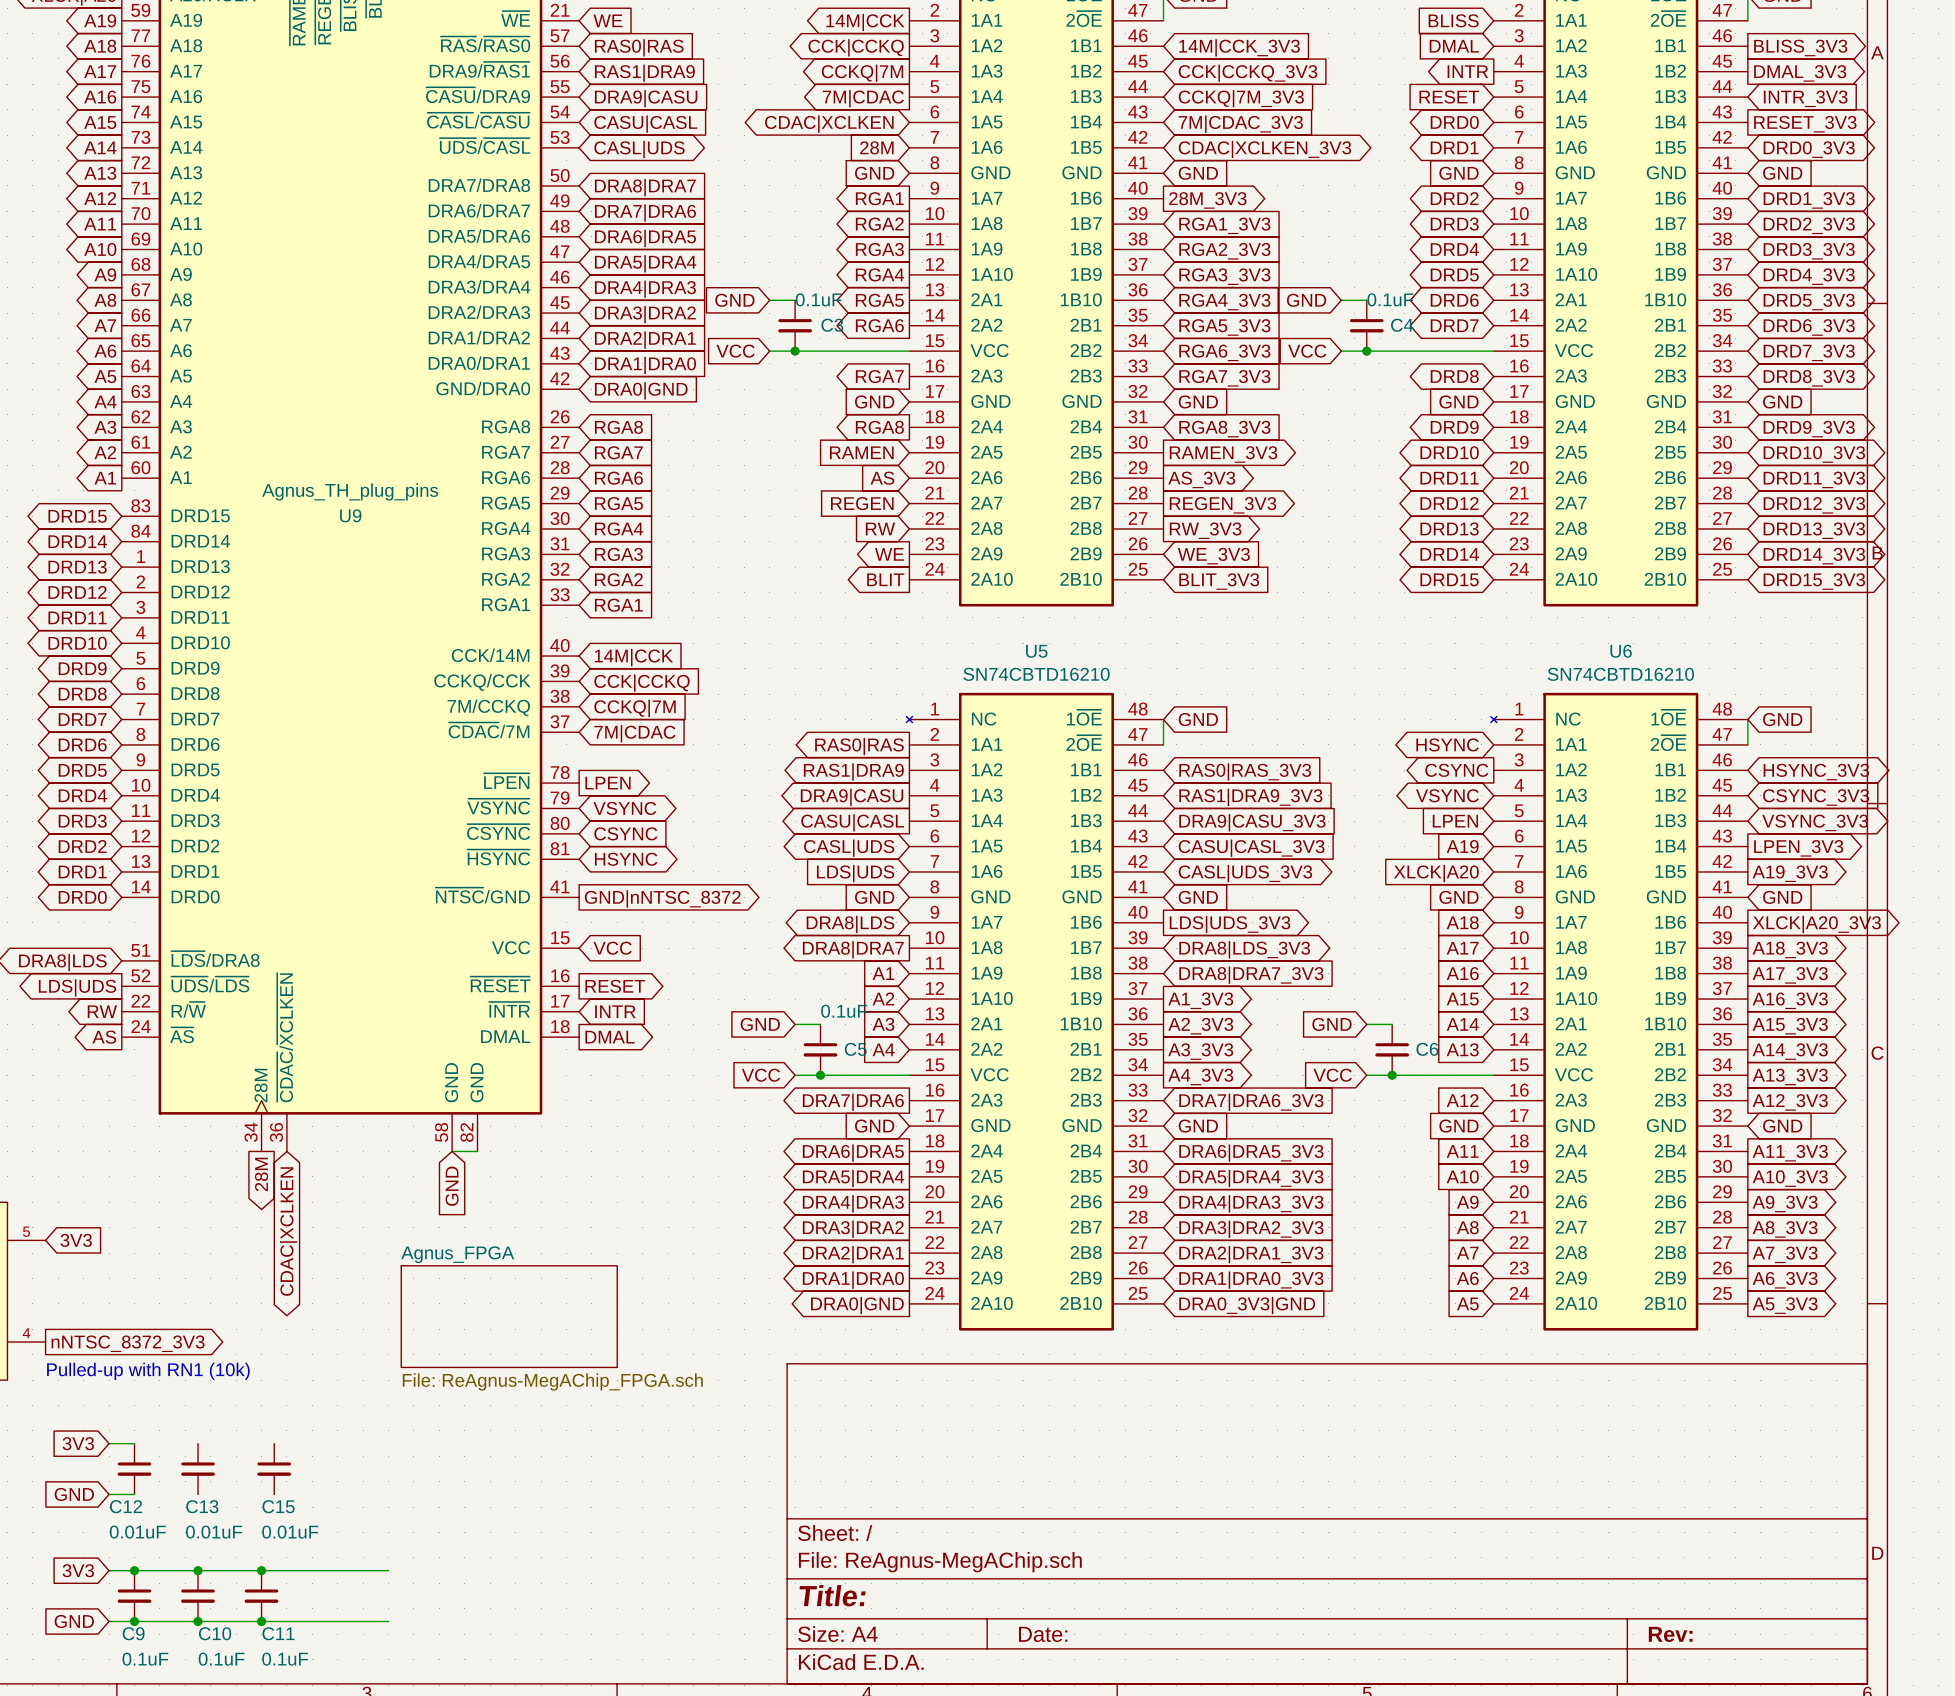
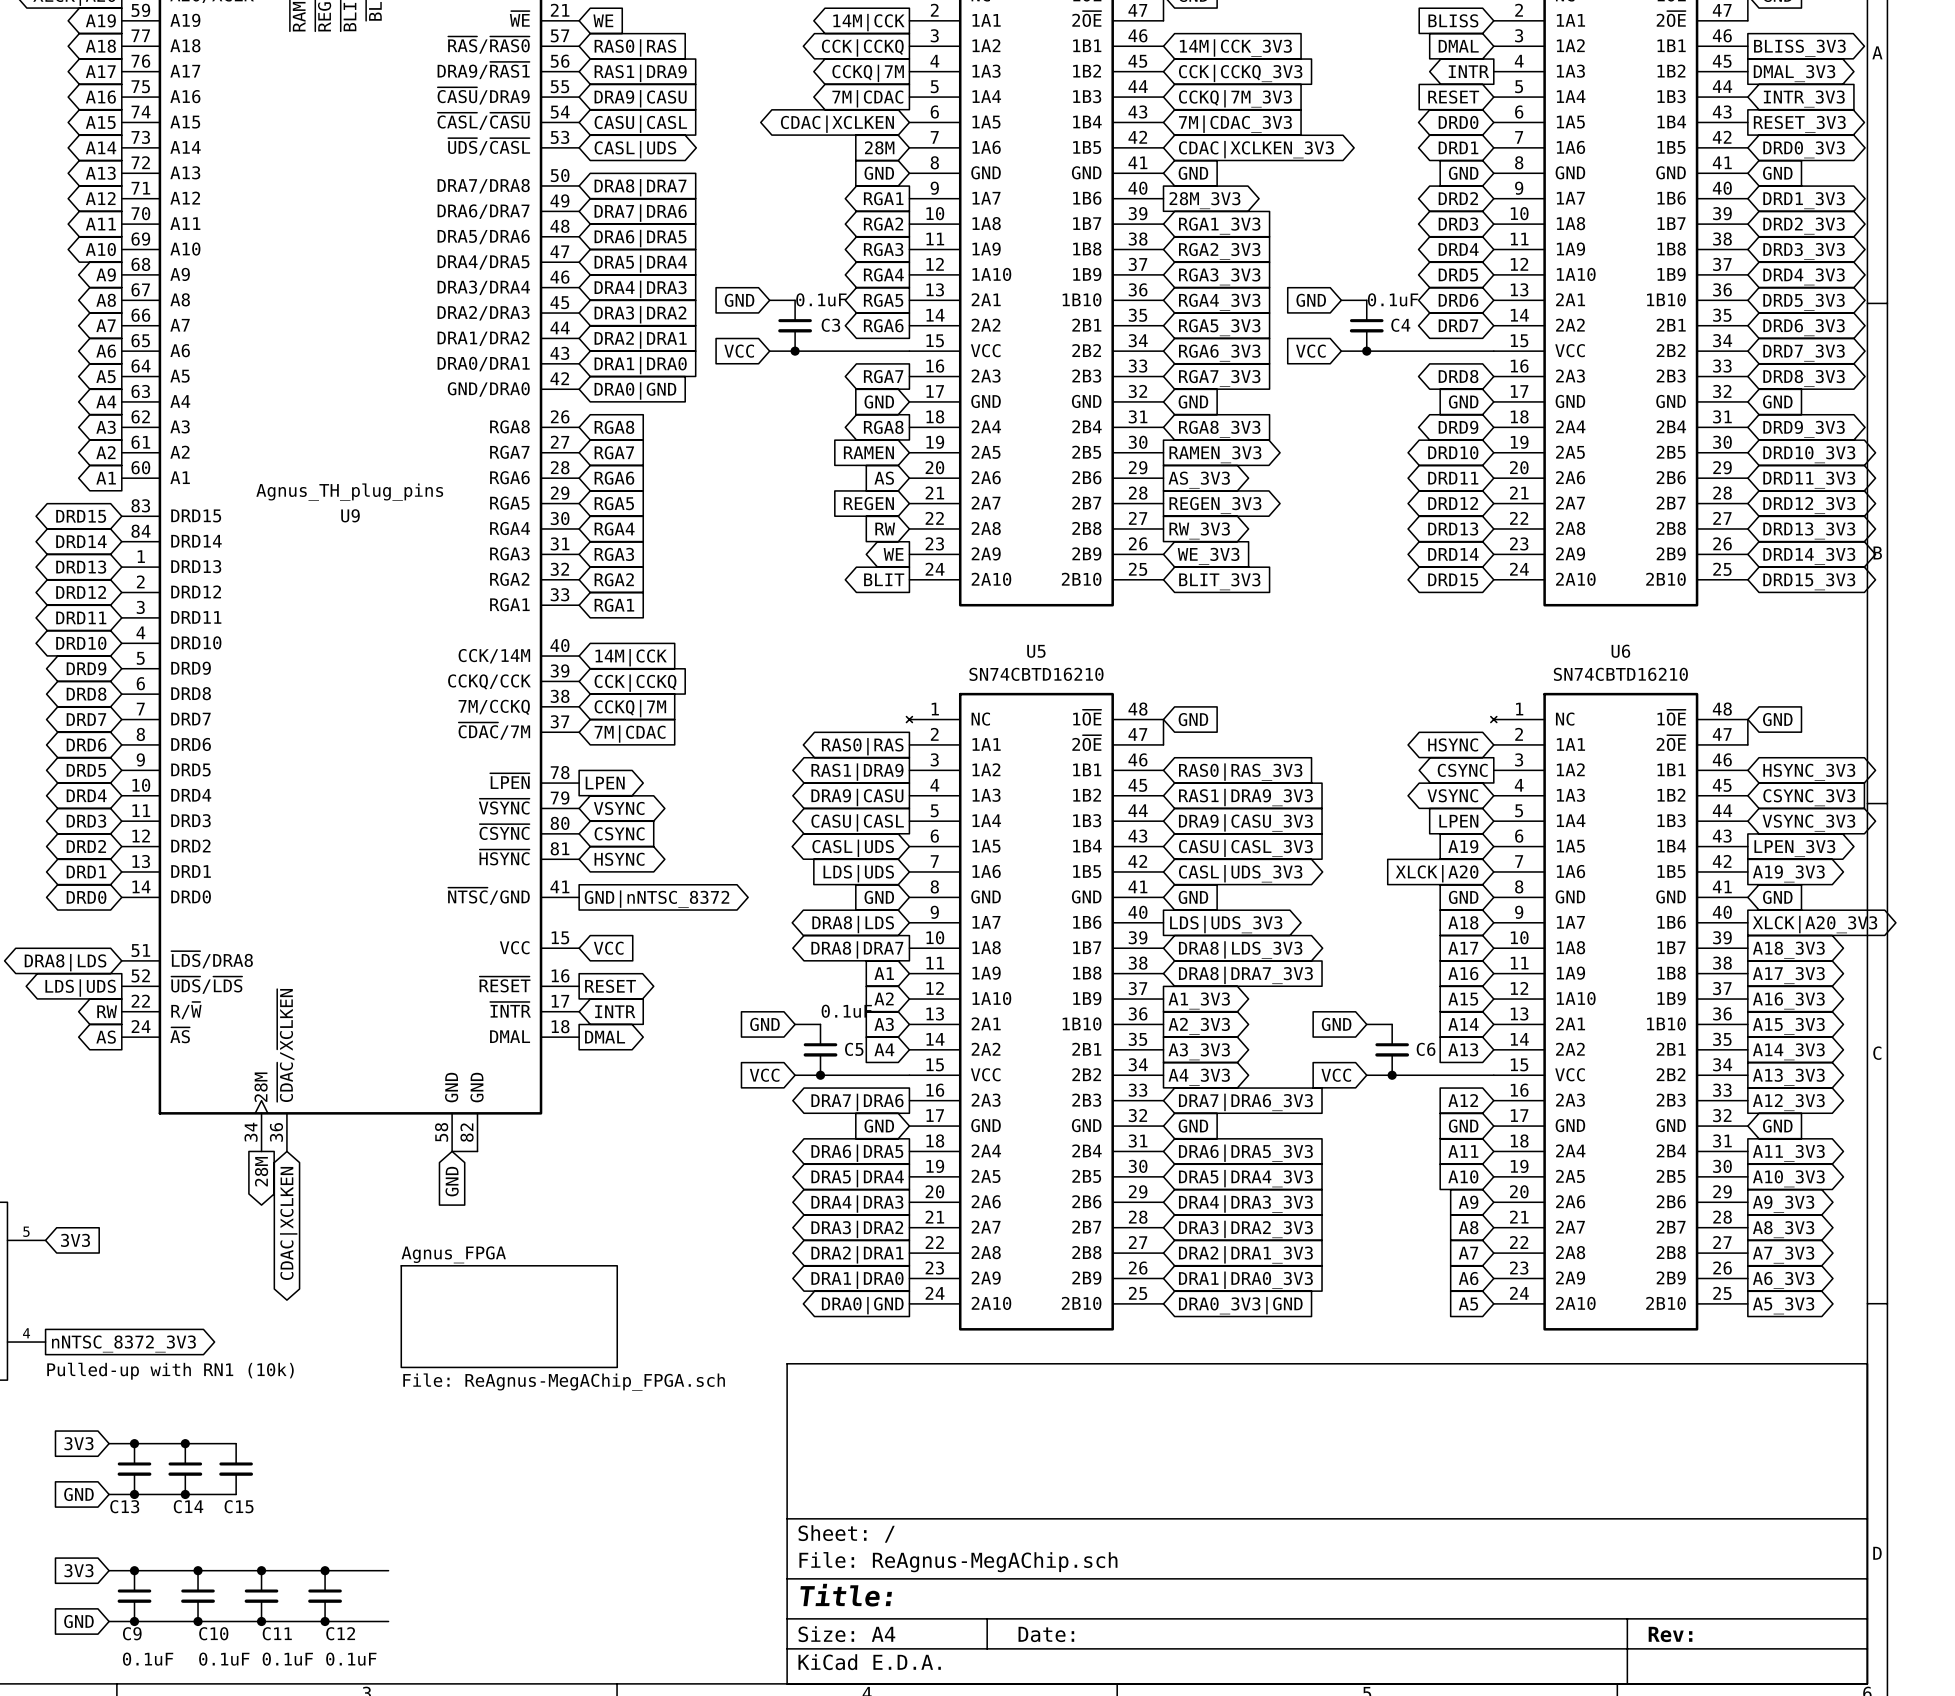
wire: none -> (134, 1443) (236, 1443)
junction: none -> (134, 1443)
junction: none -> (185, 1443)
C14: none -> (185, 1469)
C13: 0.01uF (198, 1469) -> none
C15 position: (274, 1469) -> (236, 1469)
wire: none -> (134, 1494) (236, 1494)
junction: none -> (134, 1494)
junction: none -> (185, 1494)
C12 name: C12 (126, 1506) -> C13 (124, 1506)
C12 value: 0.01uF (137, 1532) -> none
C15 value: 0.01uF (290, 1532) -> none
junction: none -> (325, 1570)
C12: none -> 0.1uF (325, 1596)
junction: none -> (325, 1621)

